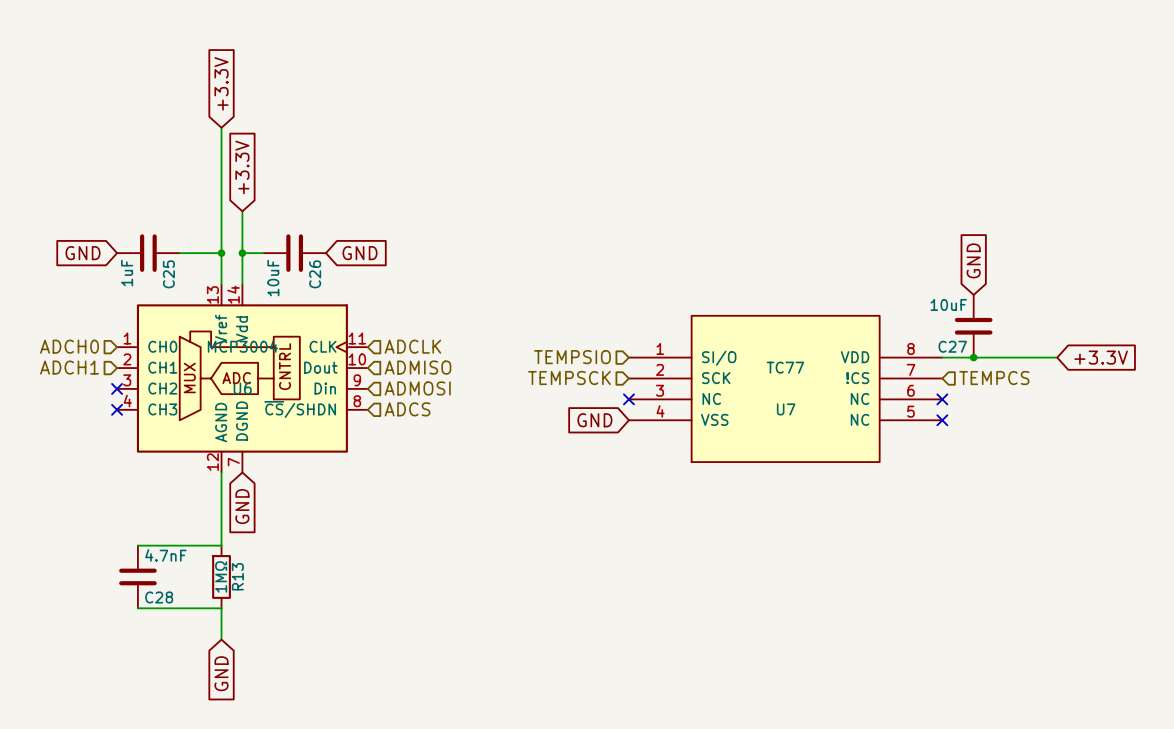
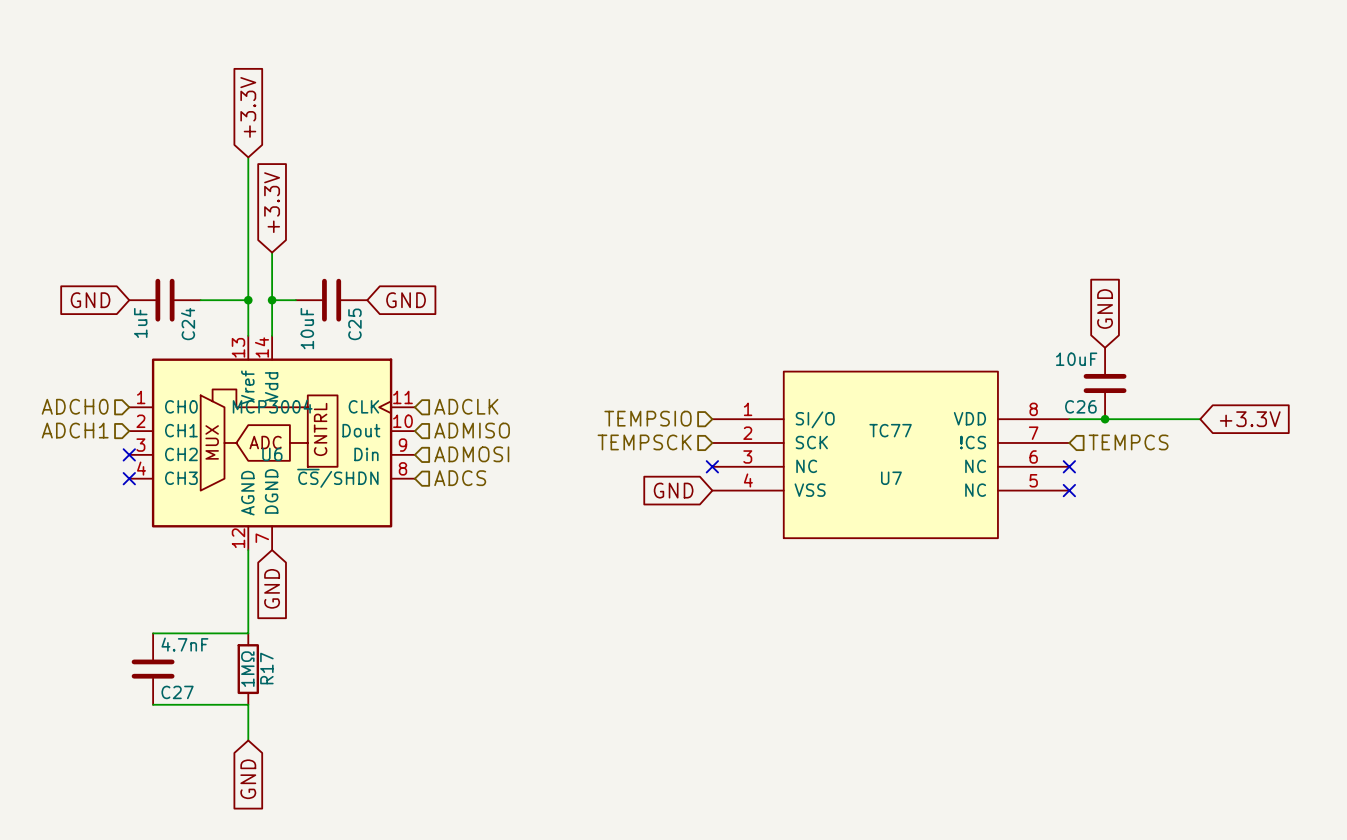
C25 name: C25 (168, 274) -> C24 (188, 324)
C26 name: C26 (315, 274) -> C25 (354, 324)
C27 name: C27 (952, 346) -> C26 (1080, 406)
R13 name: R13 (237, 576) -> R17 (266, 668)
C28 name: C28 (159, 597) -> C27 (177, 692)

